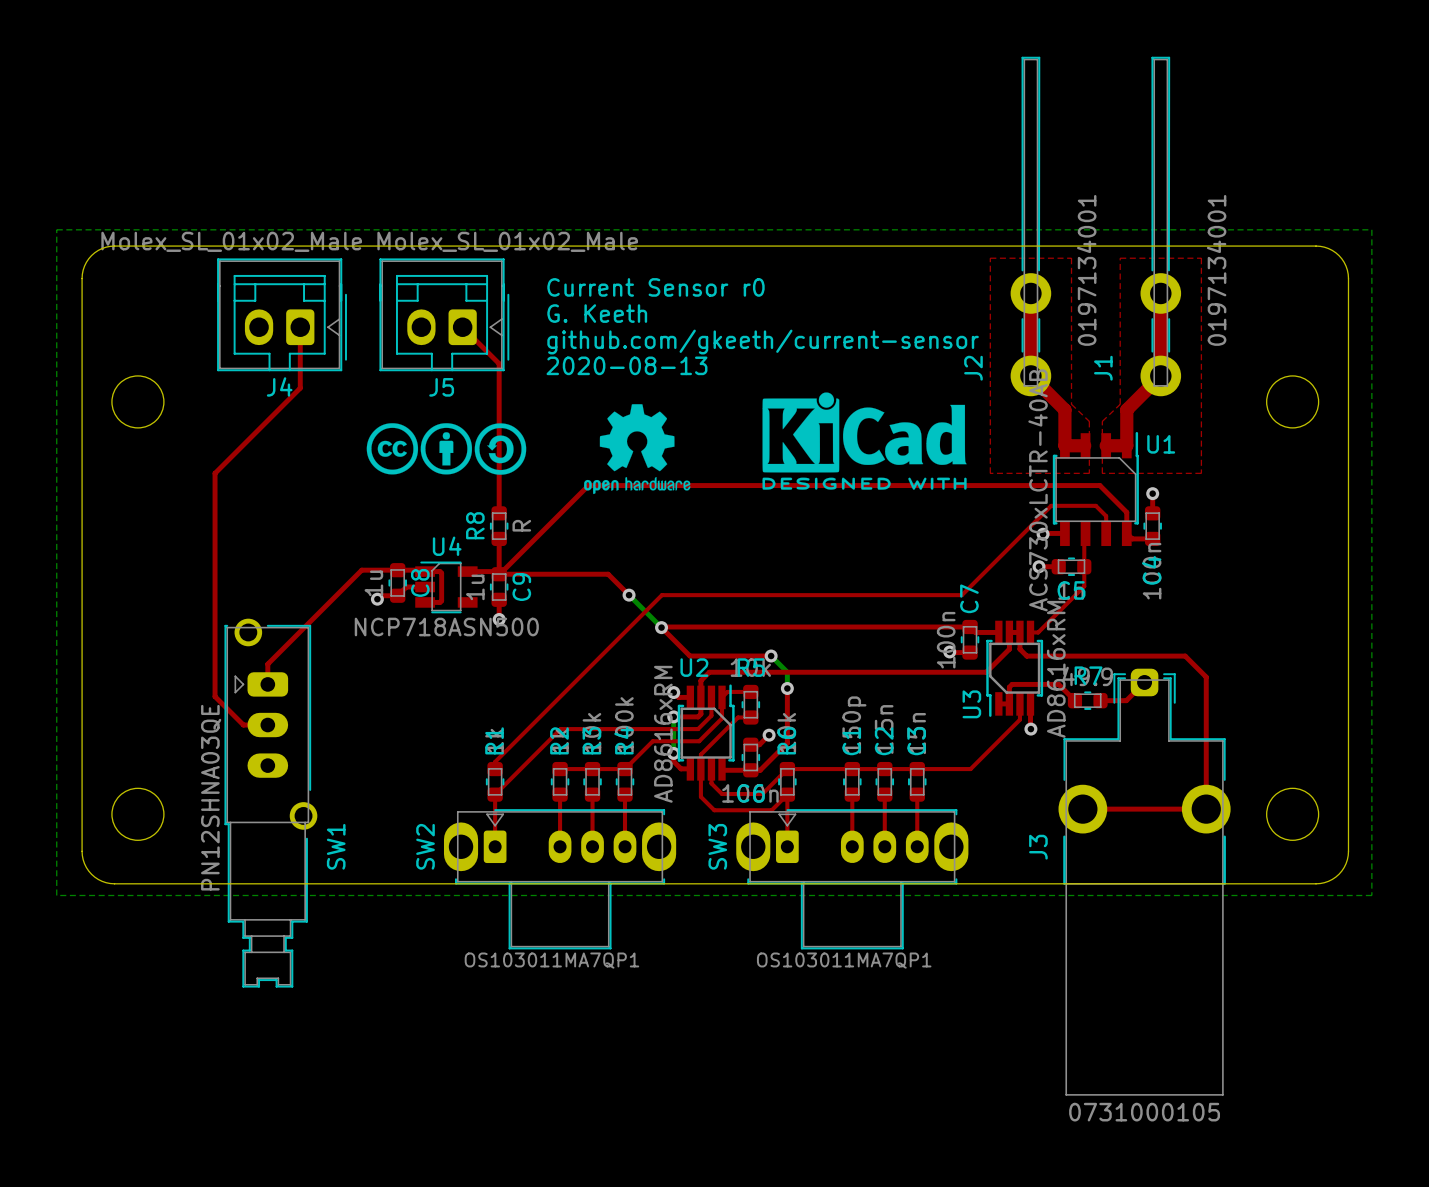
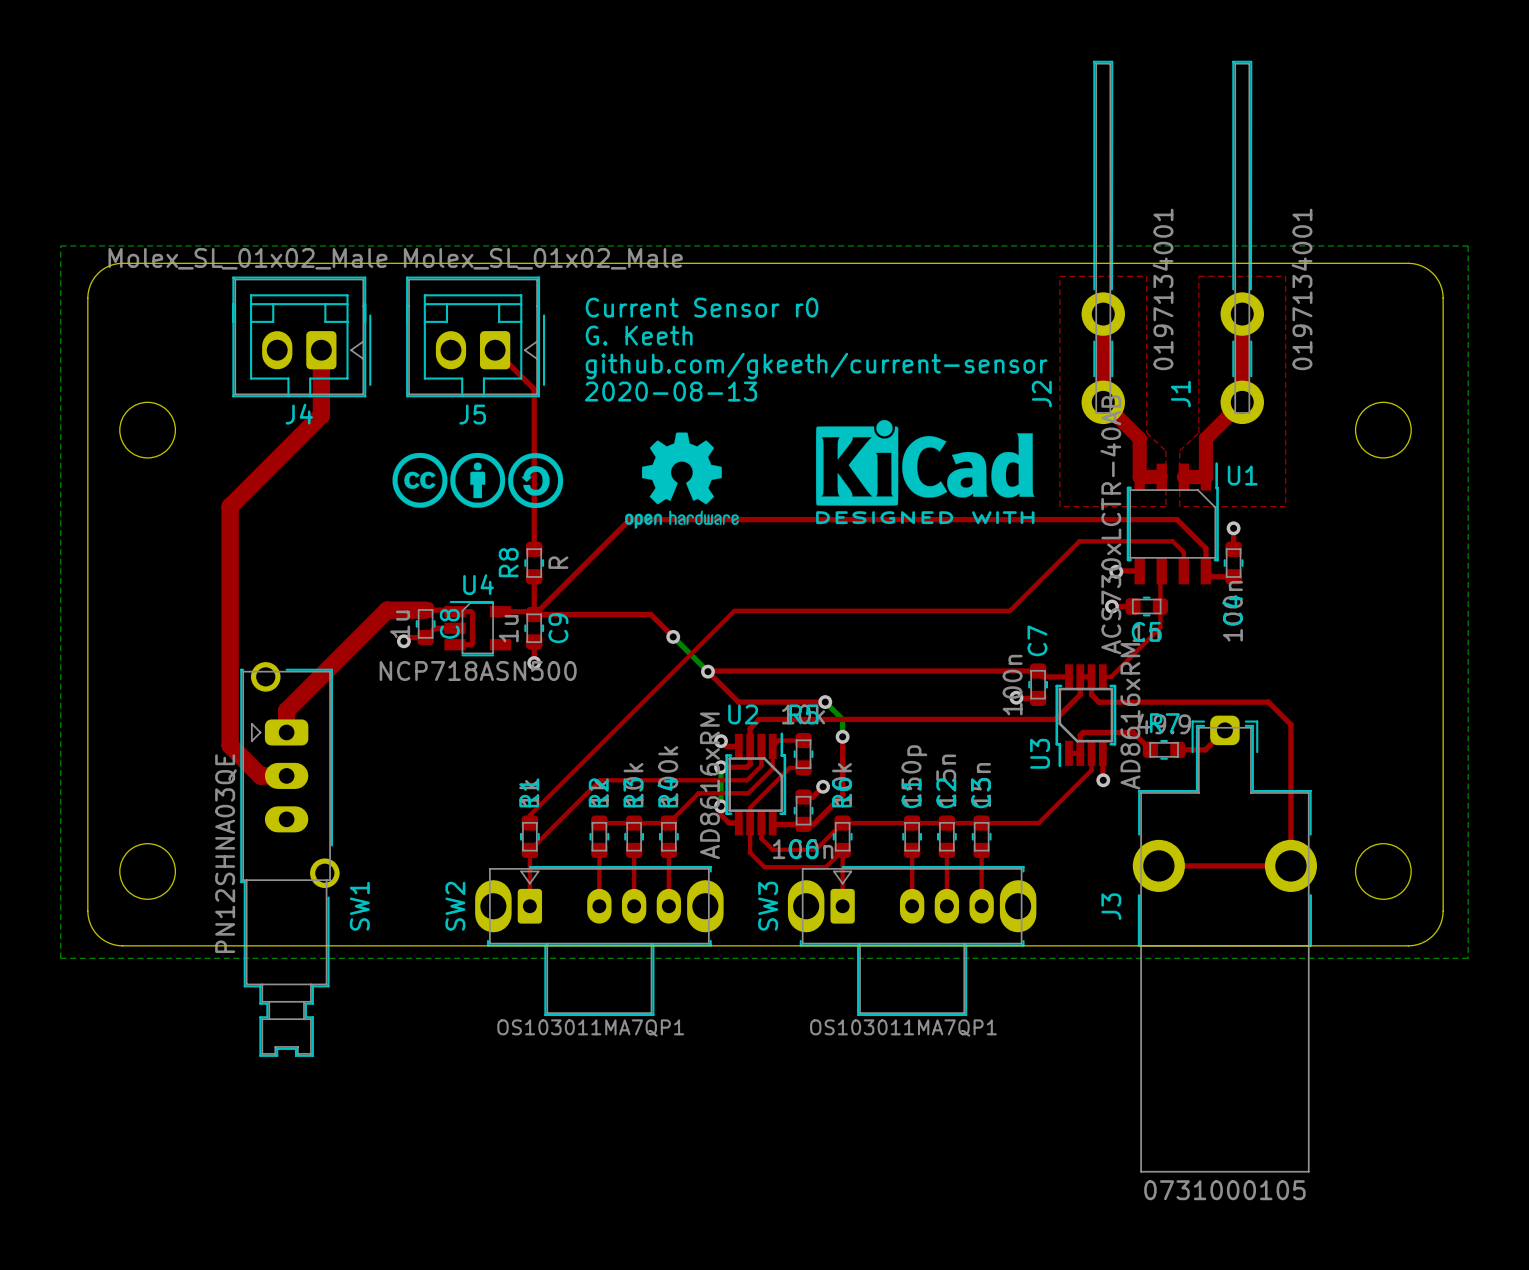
top track width: thin (300, 327) (300, 388) (215, 473) (215, 696) (243, 725) (267, 725) -> thick (321, 350) (321, 415) (230, 506) (230, 745) (260, 775) (286, 775)
top track: (1051, 505) (961, 595) (661, 595) -> (1124, 541) (1079, 541) (1009, 610) (734, 610) (708, 636)
top track width: thin (397, 570) (361, 570) (267, 664) (267, 684) -> thick (425, 610) (387, 610) (286, 710) (286, 732)

